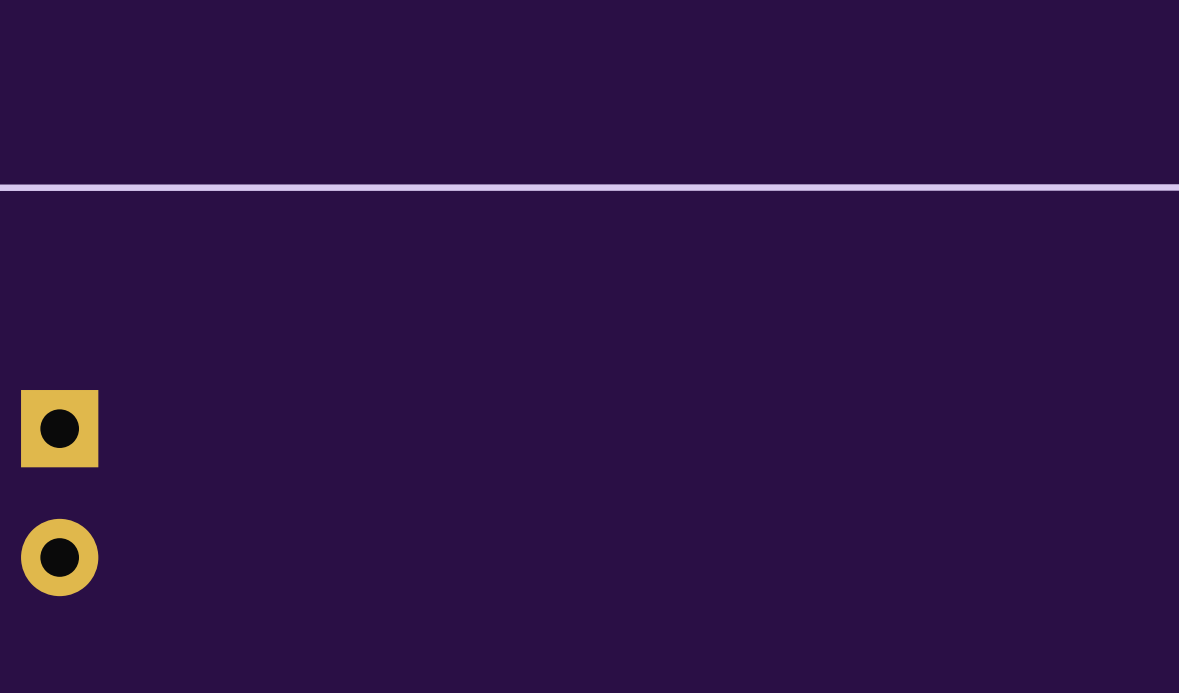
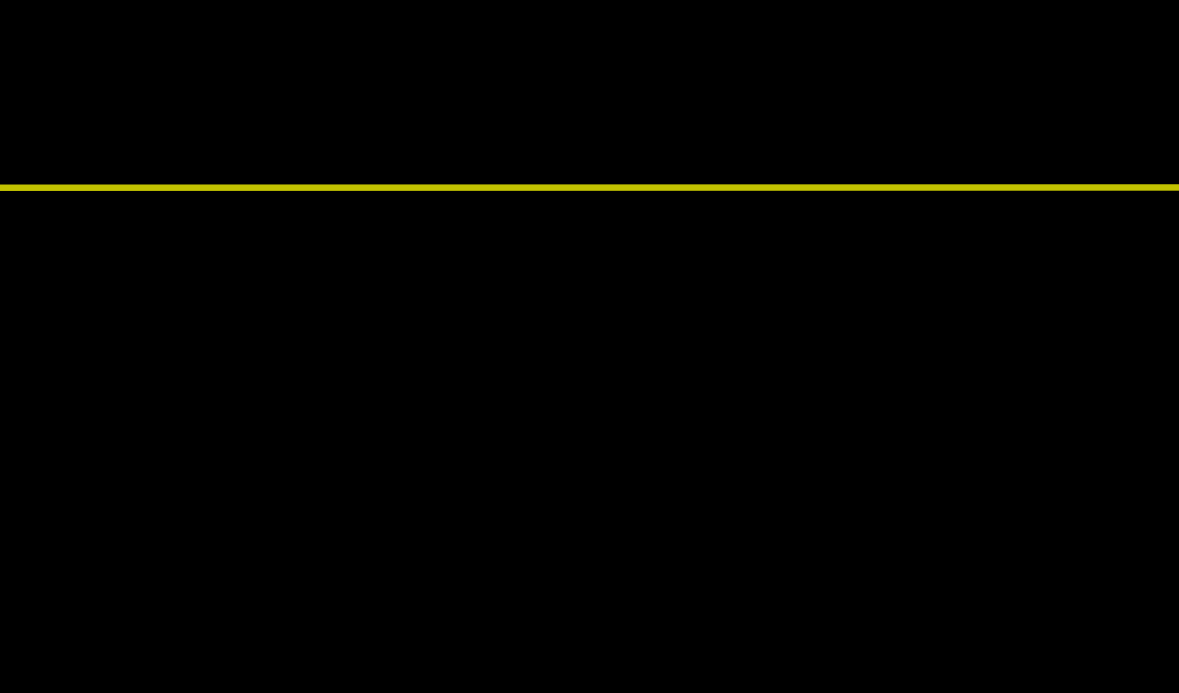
part: (59, 493) -> none

